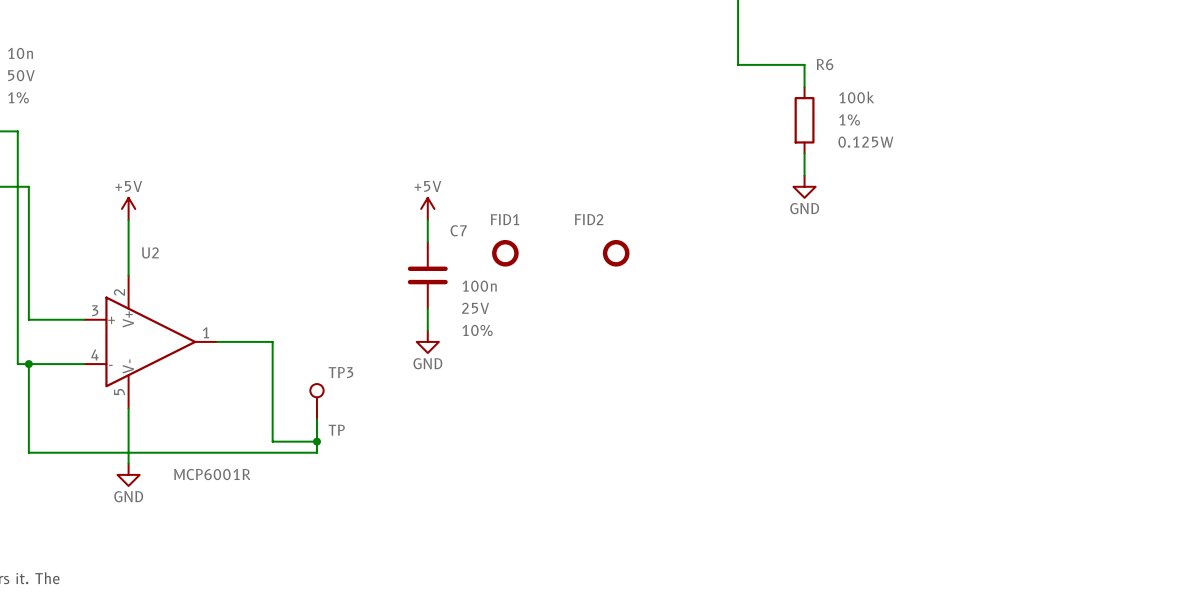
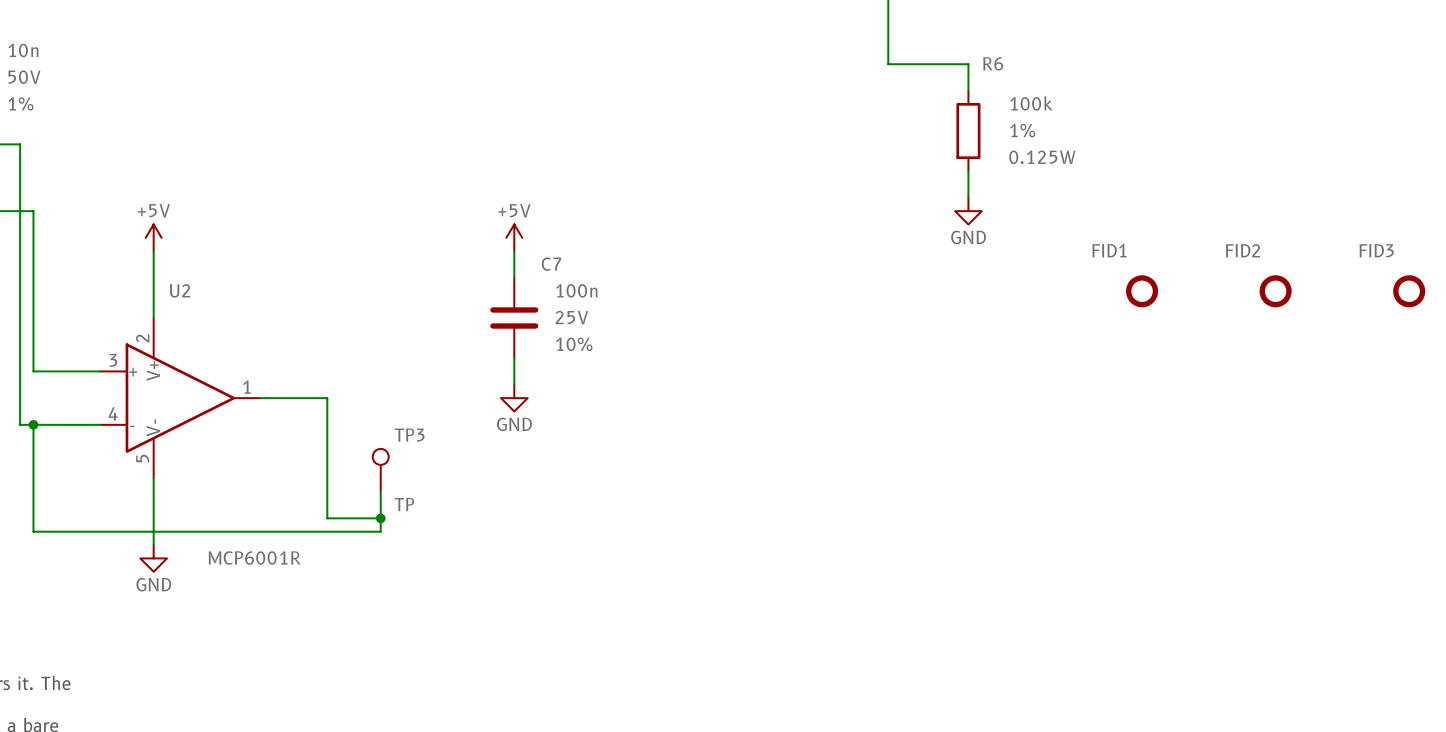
FID1 name position: FID1 (505, 219) -> FID1 (1109, 250)
FID1 position: (505, 253) -> (1142, 291)
FID2 position: (616, 253) -> (1275, 291)
FID3: none -> (1409, 291)
C7 value position: 100n (479, 286) -> 100n (576, 290)
C7 text position: 25V (475, 308) -> 25V (571, 317)
C7 text position: 10% (477, 330) -> 10% (574, 344)

